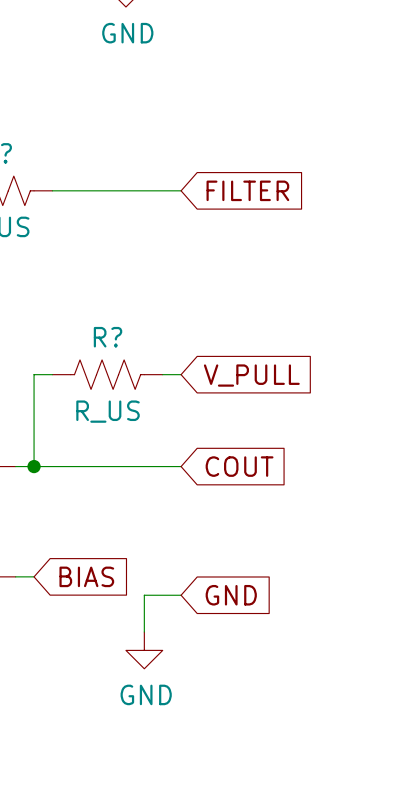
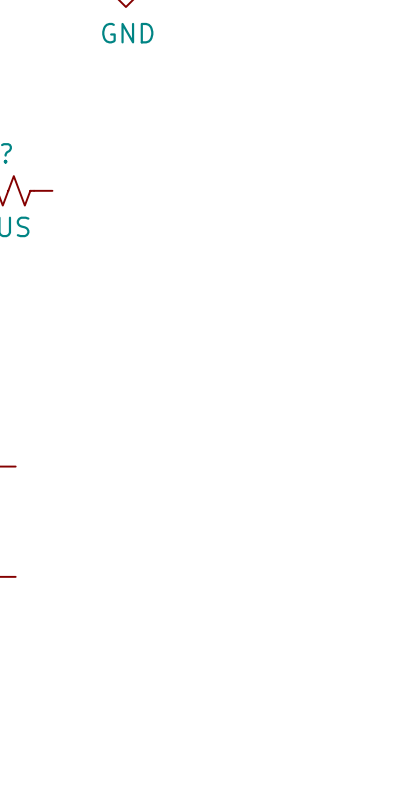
wire: (52, 190) (181, 190) -> none
global label: FILTER (247, 190) -> none
wire: (52, 374) (34, 374) (34, 466) -> none
R?: R_US (107, 374) -> none
wire: (162, 374) (181, 374) -> none
global label: V_PULL (251, 375) -> none
wire: (15, 466) (181, 466) -> none
junction: (34, 466) -> none
global label: COUT (239, 466) -> none
wire: (15, 576) (34, 576) -> none
global label: BIAS (86, 576) -> none
wire: (181, 595) (144, 595) (144, 632) -> none
global label: GND (231, 595) -> none
power symbol: GND (144, 650) -> none

